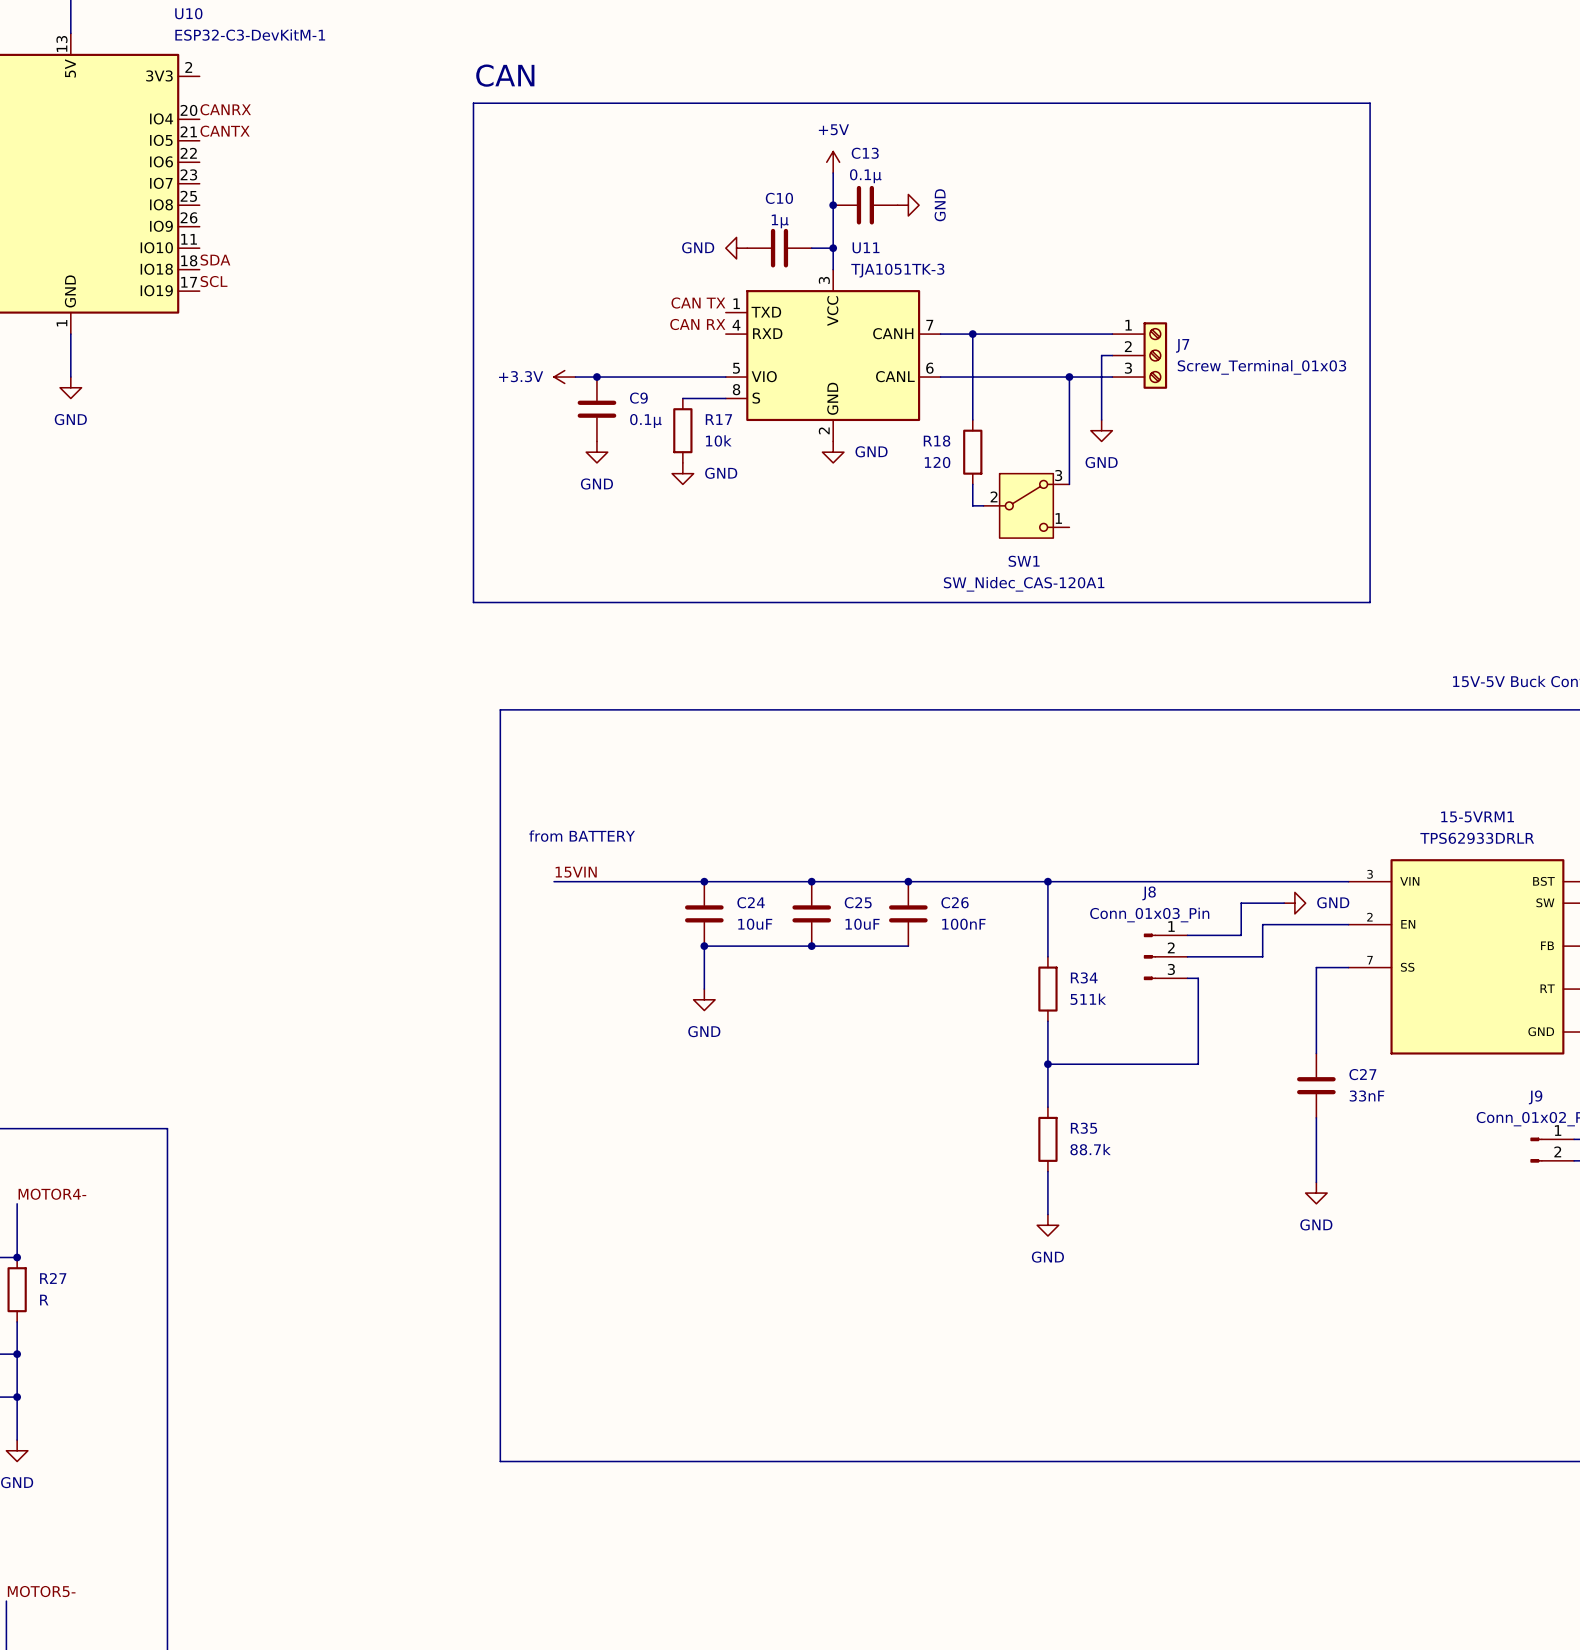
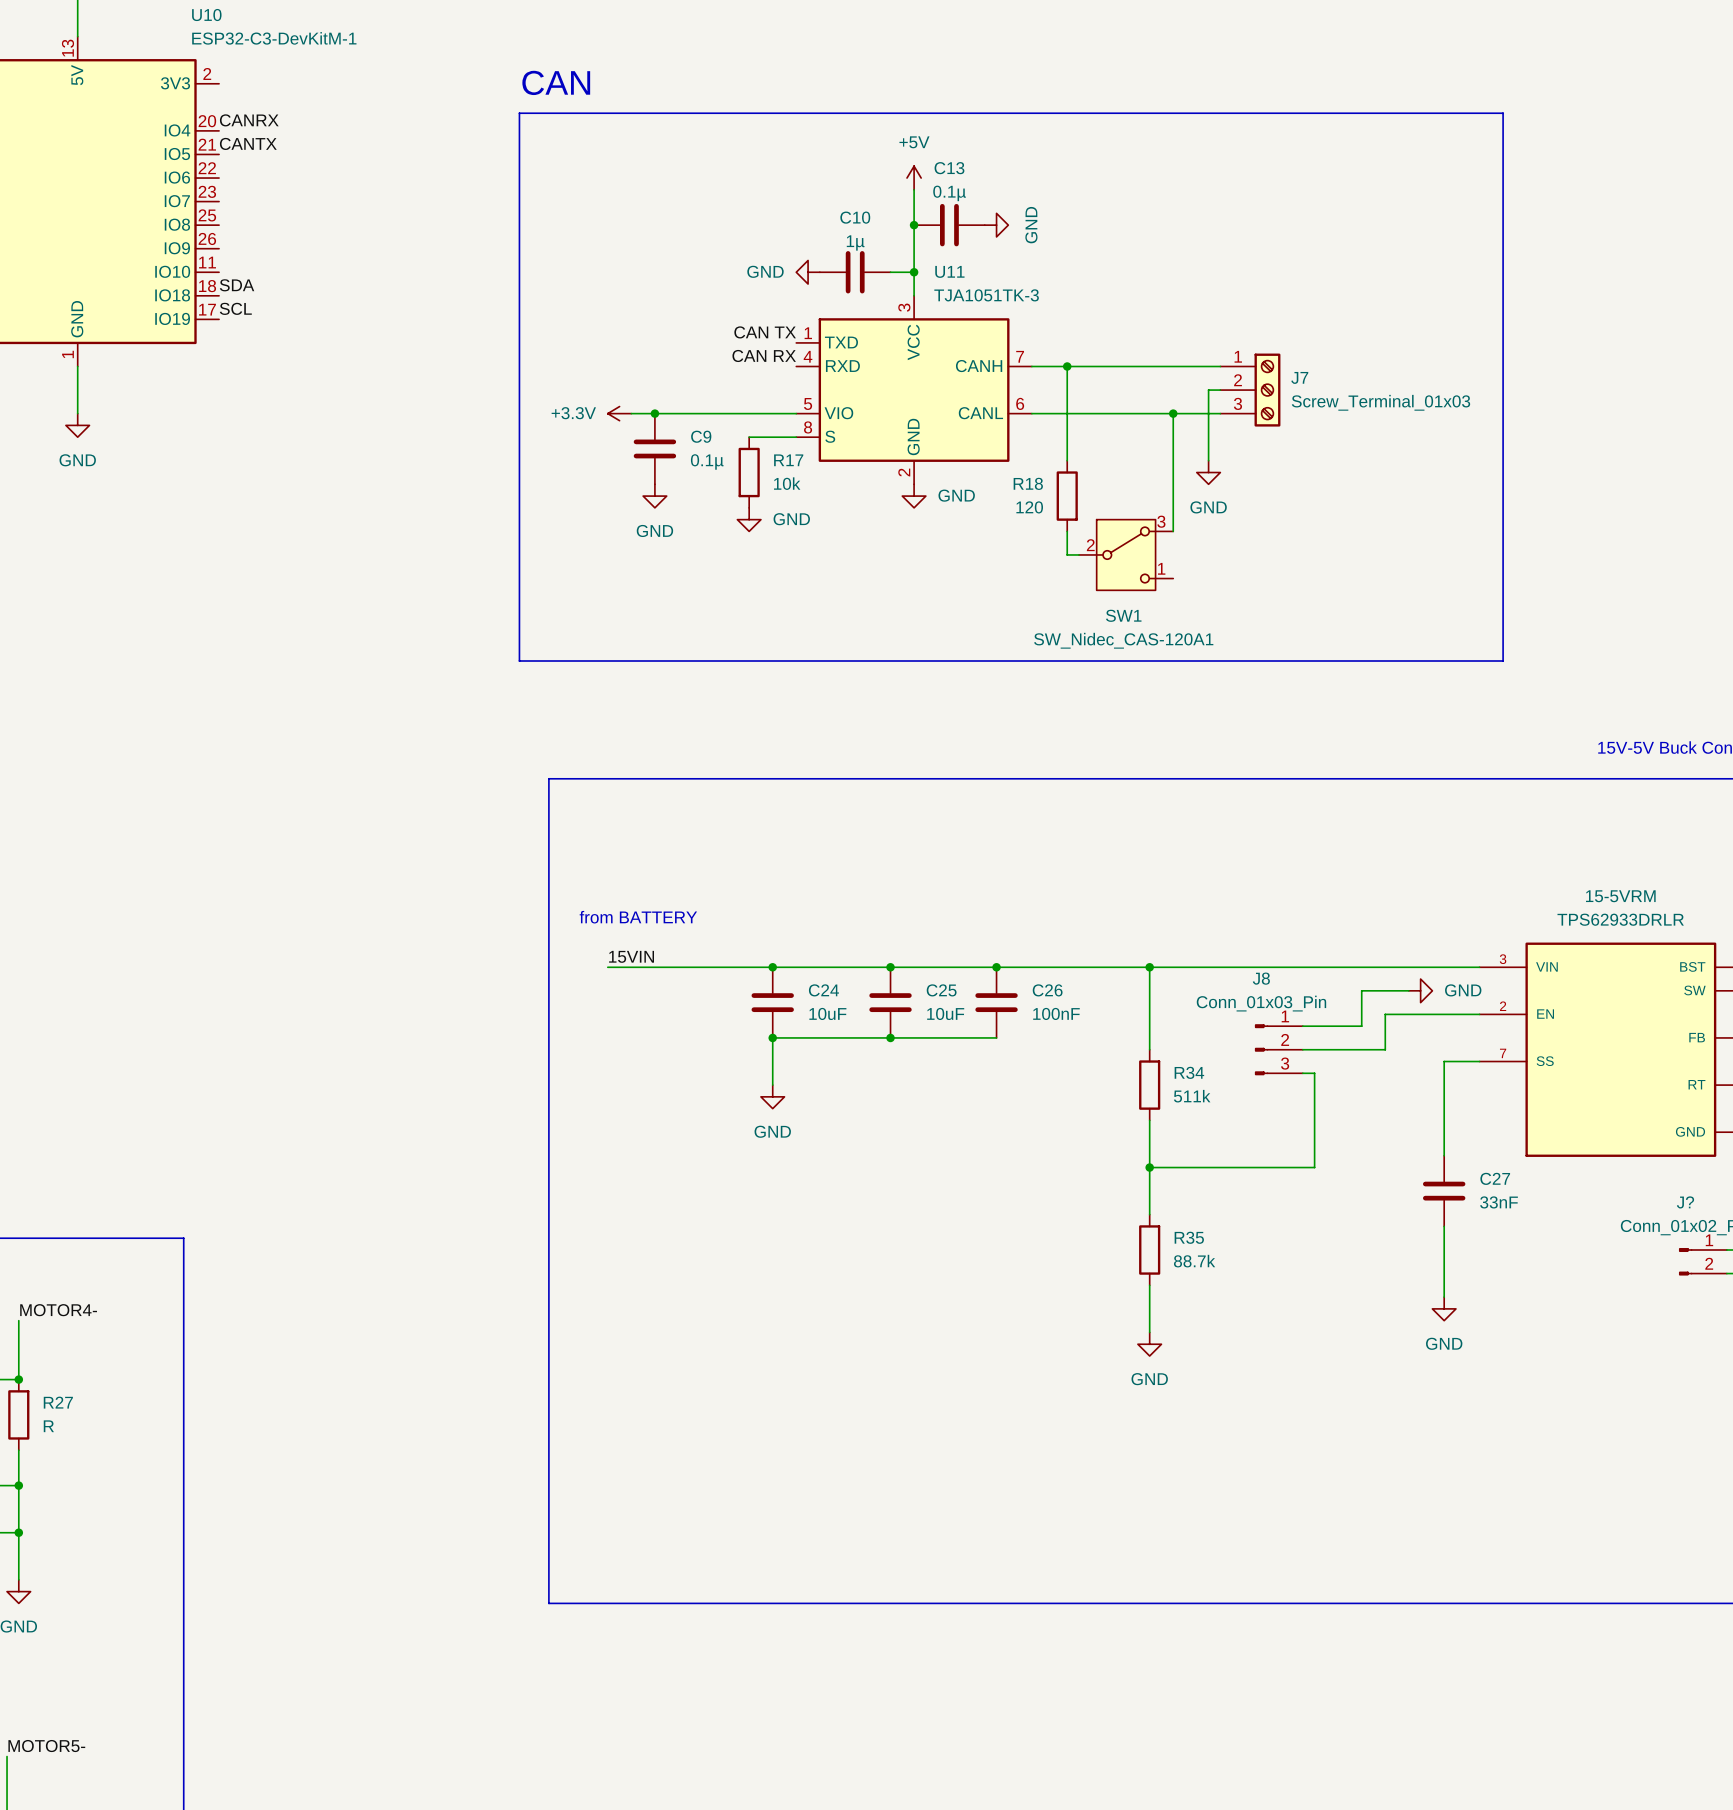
15-5VRM1 name: 15-5VRM1 (1477, 816) -> 15-5VRM (1620, 896)
J9 name: J9 (1535, 1097) -> J? (1685, 1202)

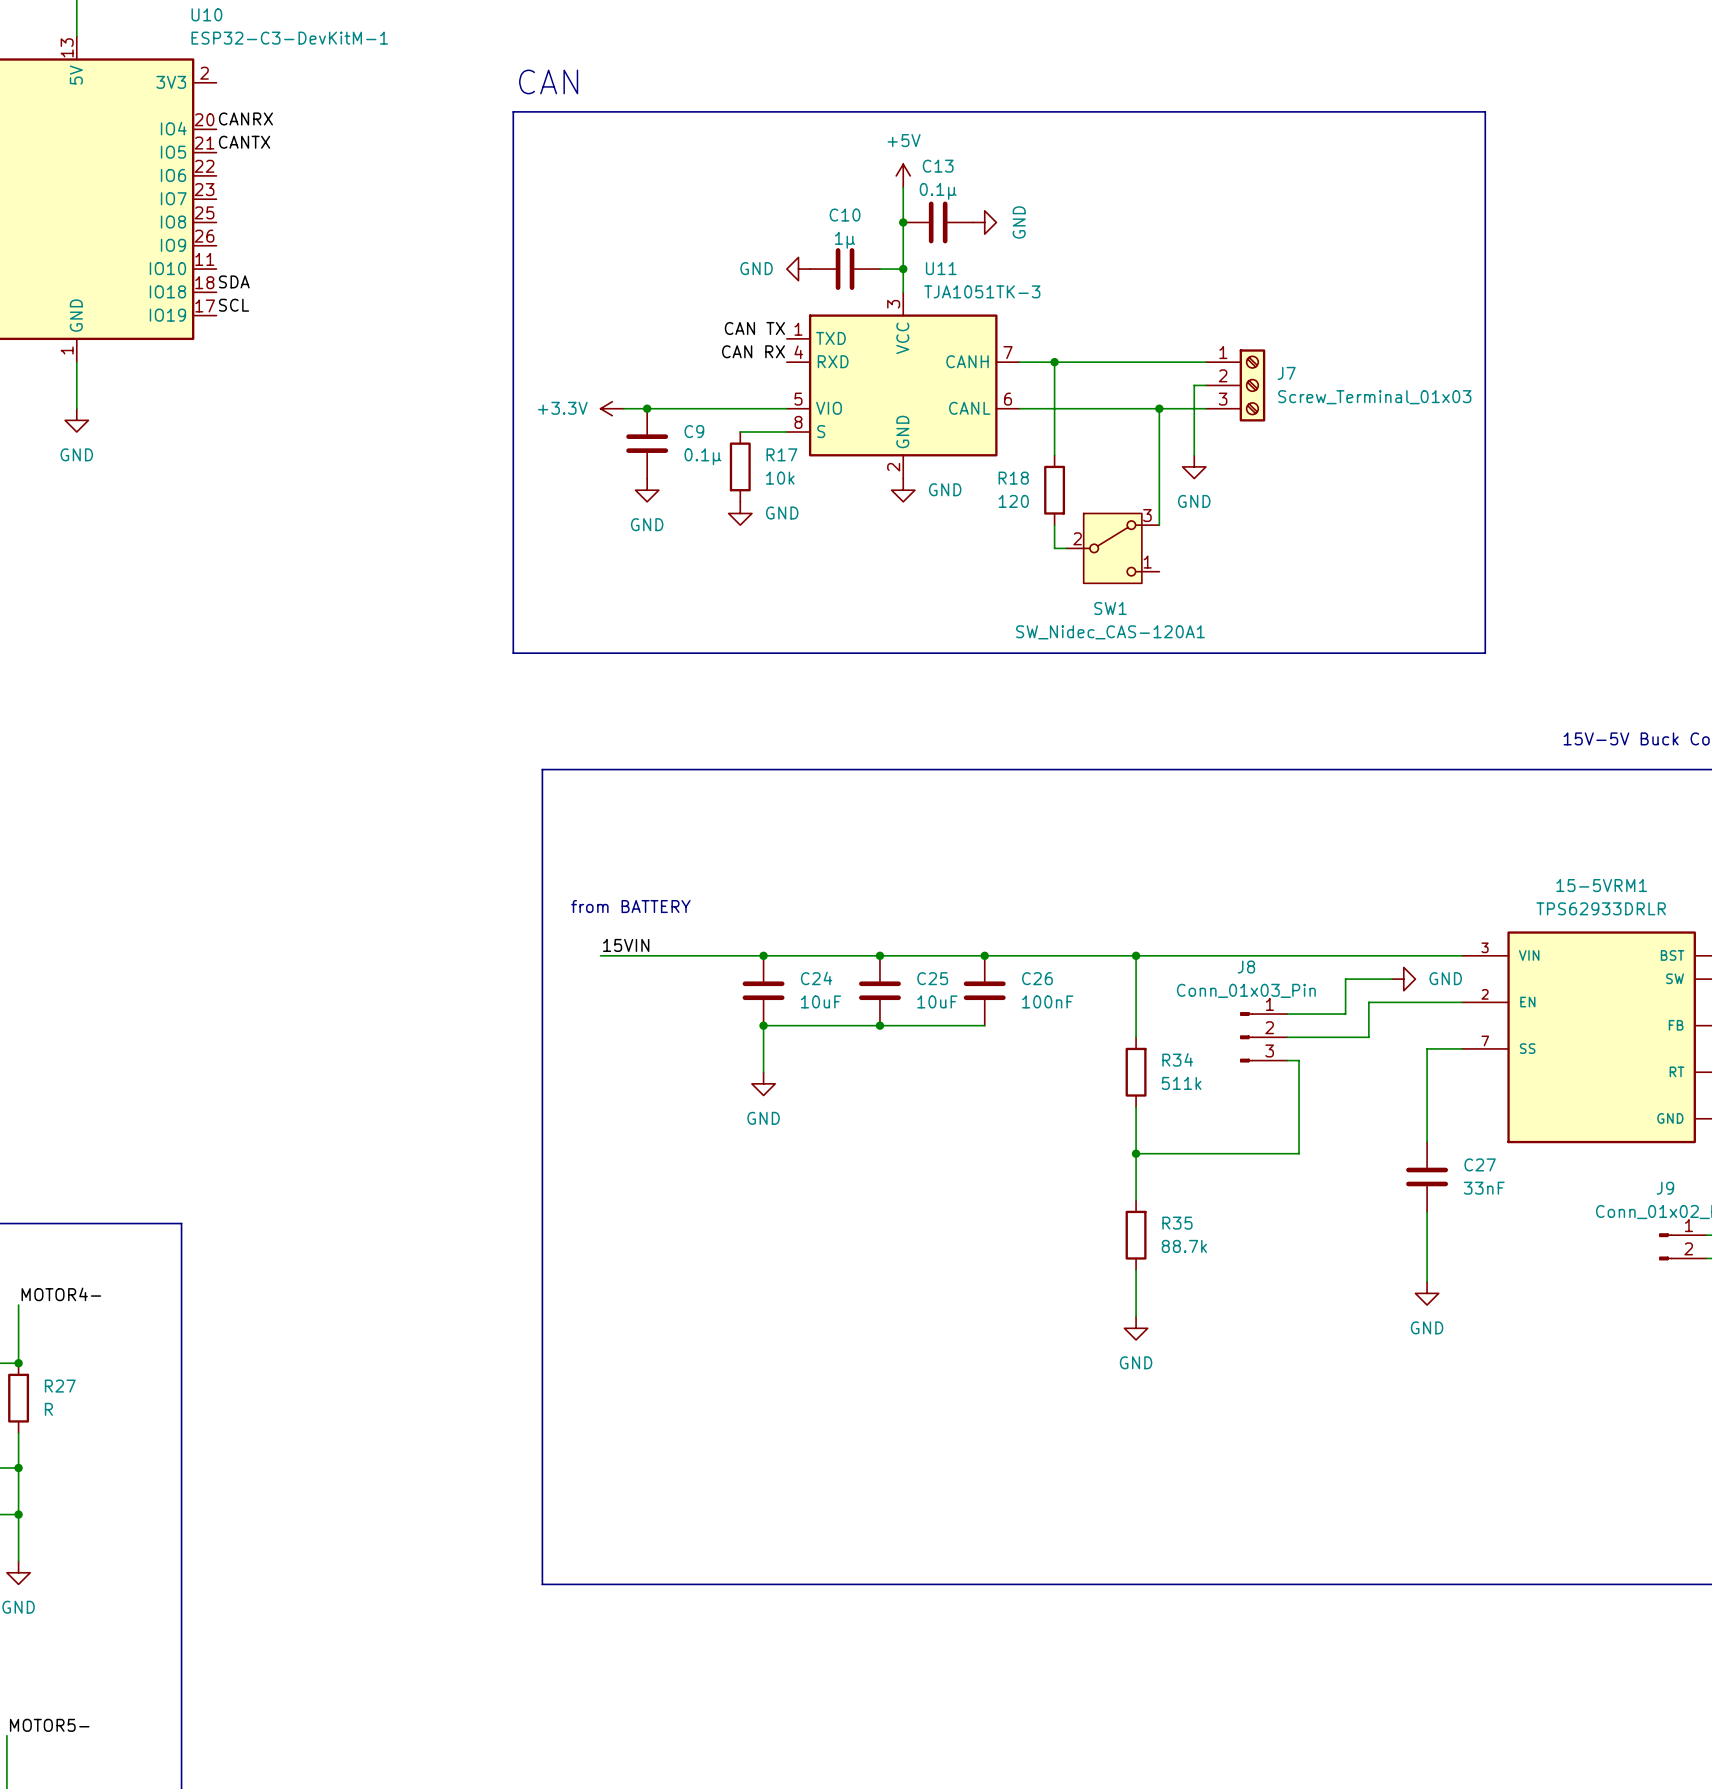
15-5VRM name: 15-5VRM (1620, 896) -> 15-5VRM1 (1601, 885)
J? name: J? (1685, 1202) -> J9 (1665, 1188)

